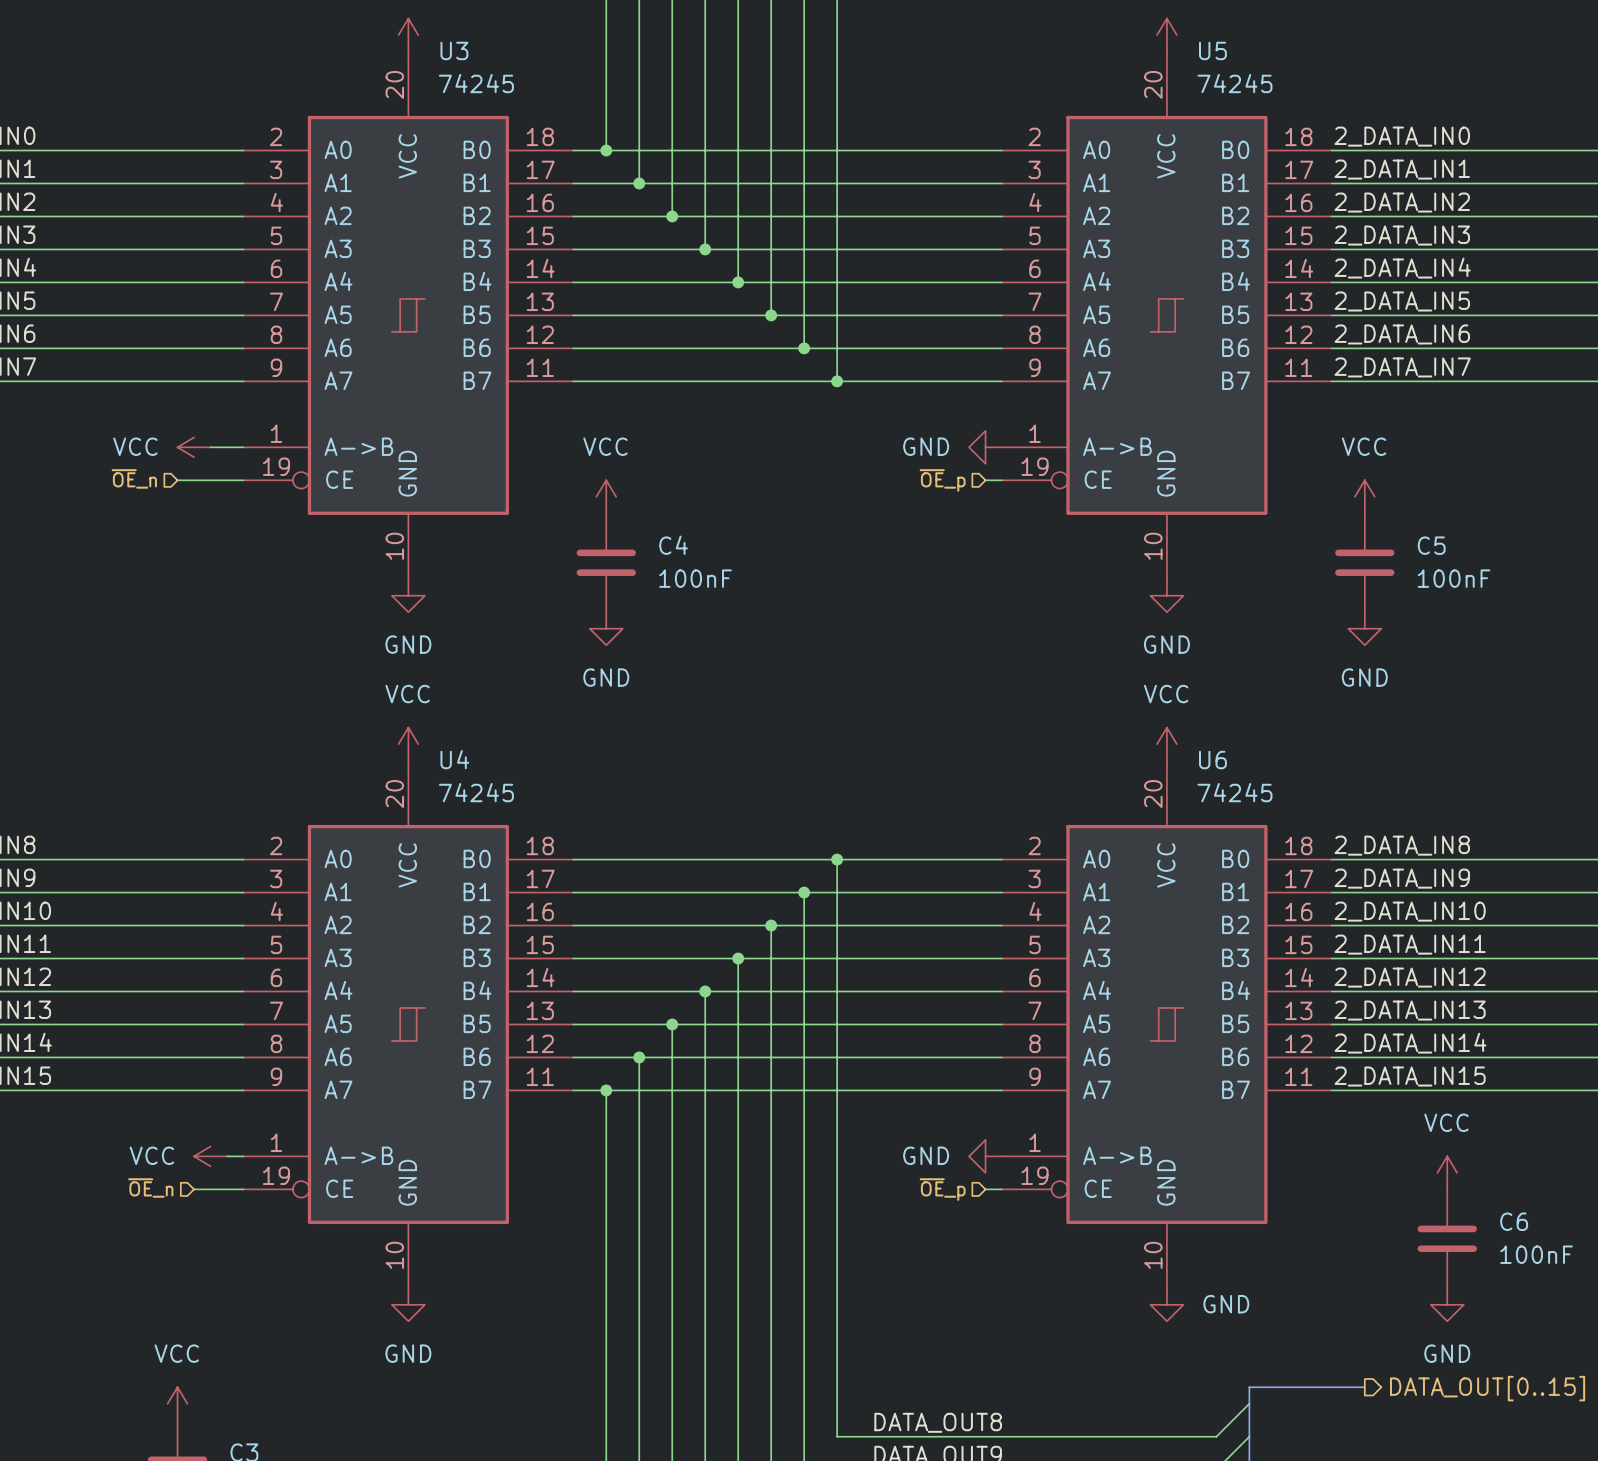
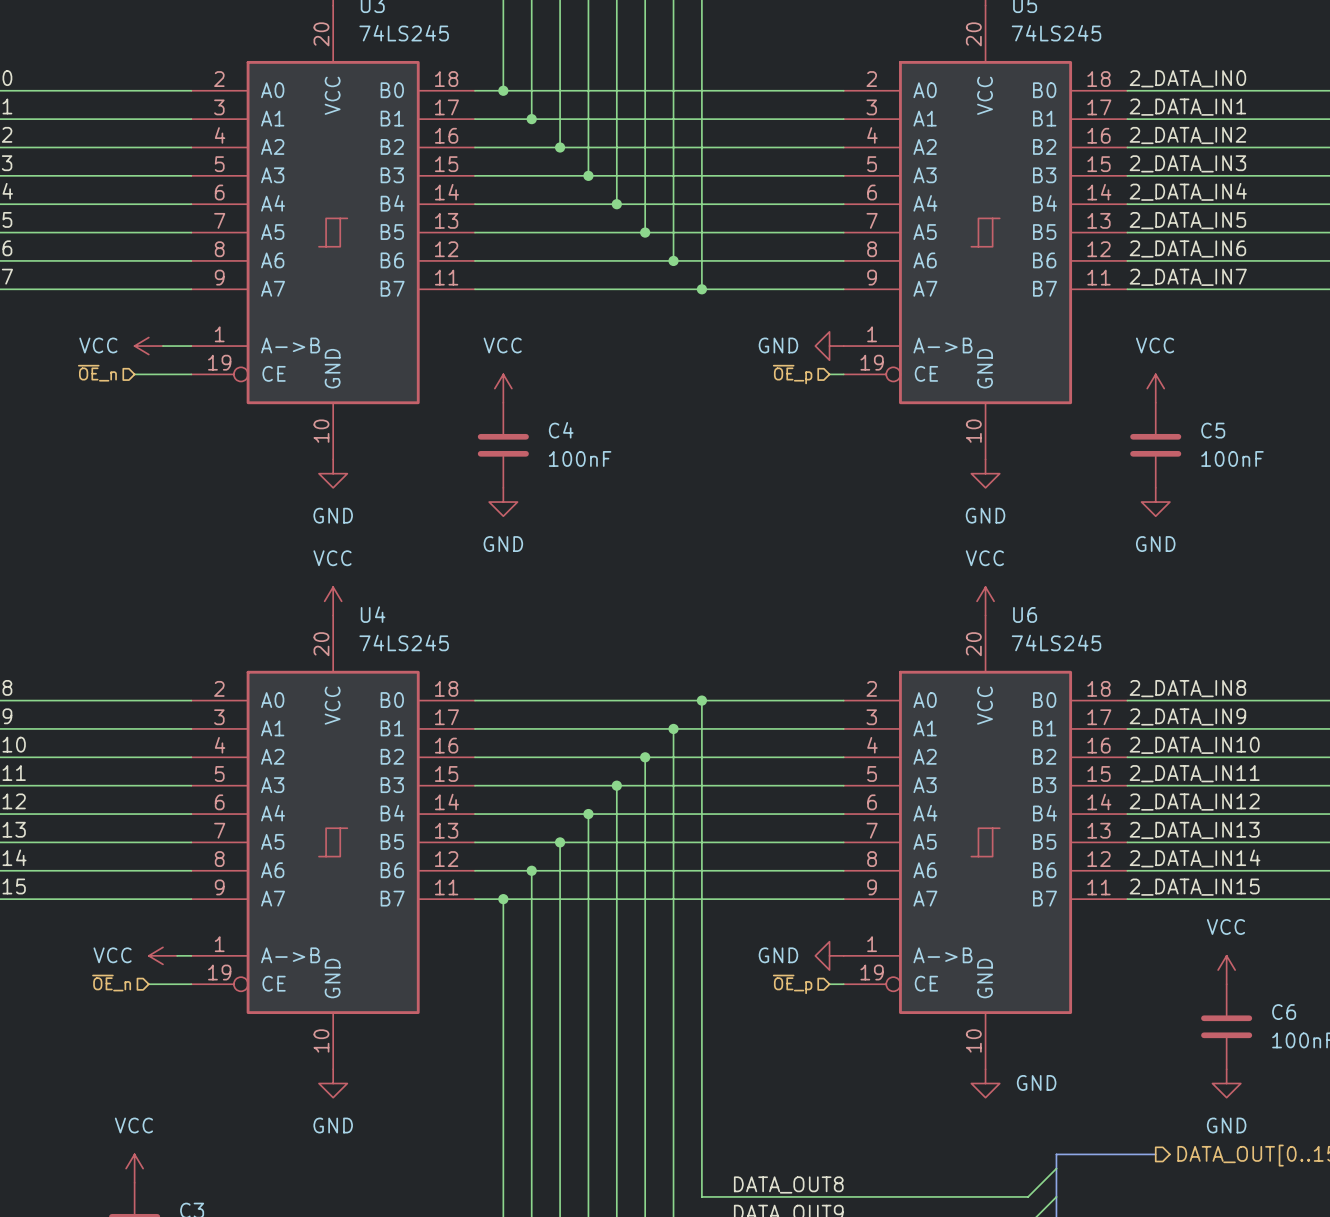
U3 value: 74245 (476, 83) -> 74LS245 (404, 33)
U5 value: 74245 (1234, 83) -> 74LS245 (1056, 33)
U4 value: 74245 (476, 792) -> 74LS245 (404, 642)
U6 value: 74245 (1234, 792) -> 74LS245 (1056, 642)

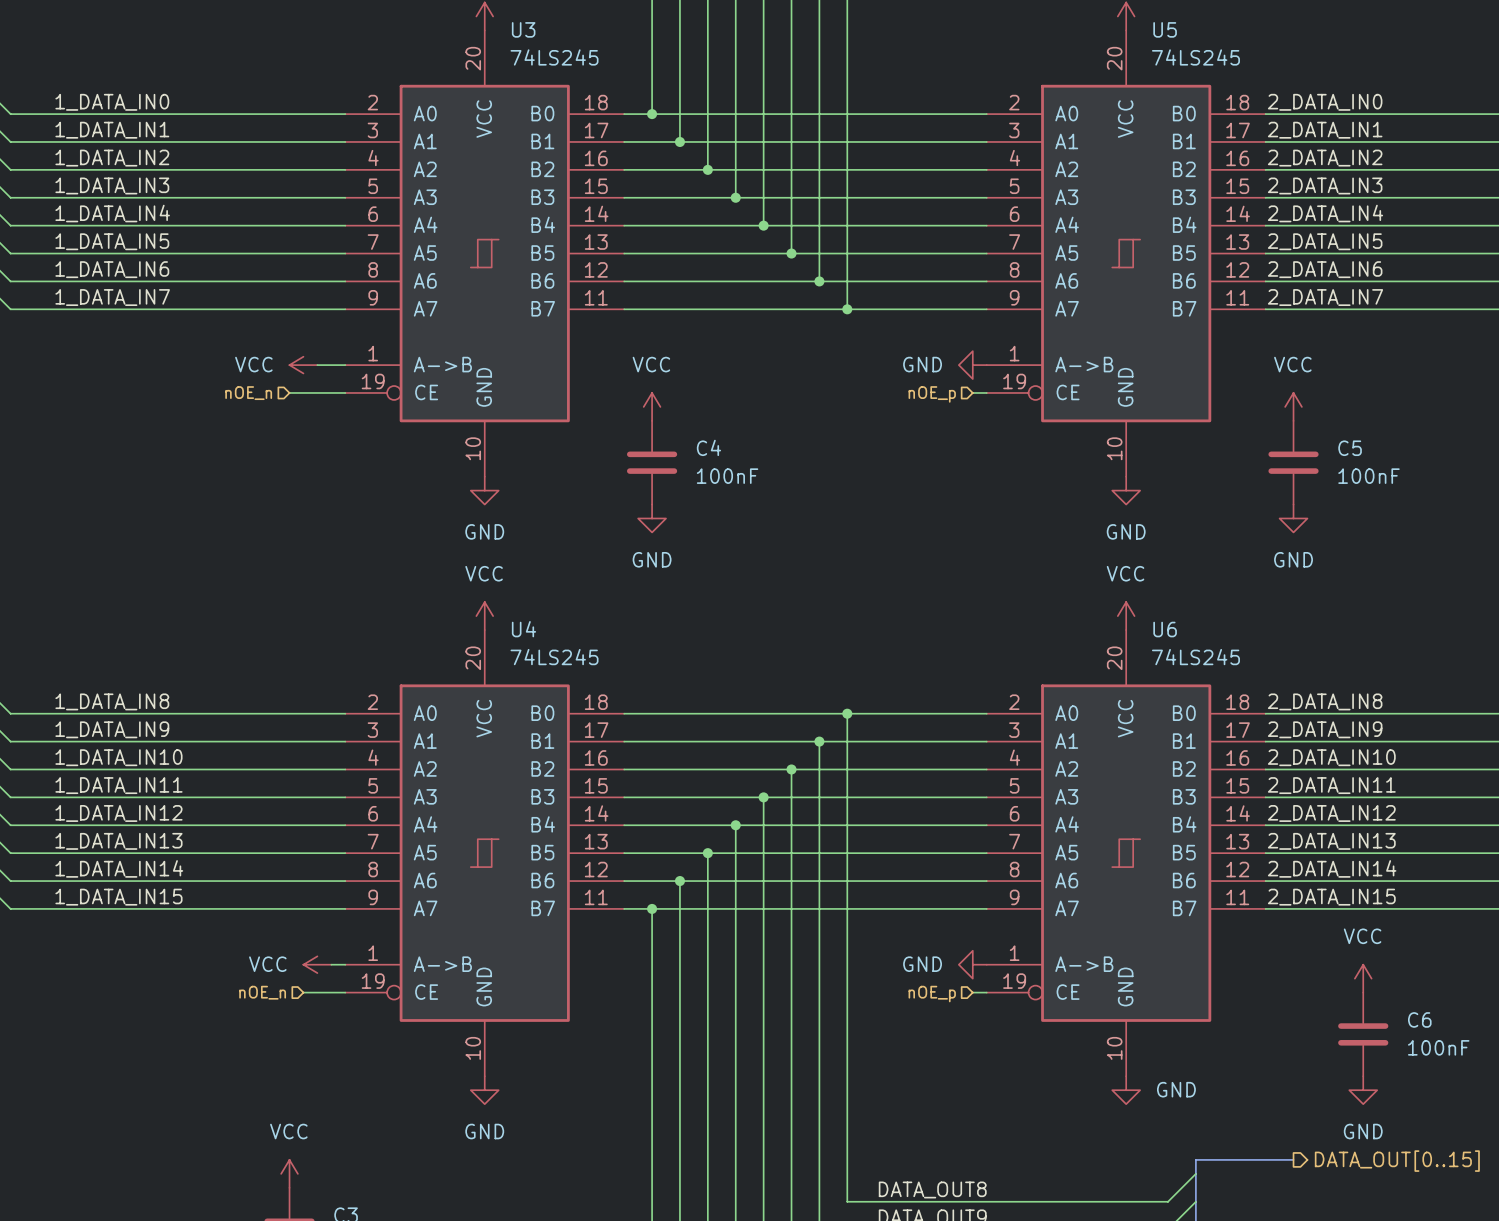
hierarchical label: ~{OE}_n (97, 373) -> nOE_n (248, 393)
hierarchical label: ~{OE}_p (792, 374) -> nOE_p (932, 394)
hierarchical label: ~{OE}_n (111, 983) -> nOE_n (262, 992)
hierarchical label: ~{OE}_p (792, 984) -> nOE_p (932, 994)

